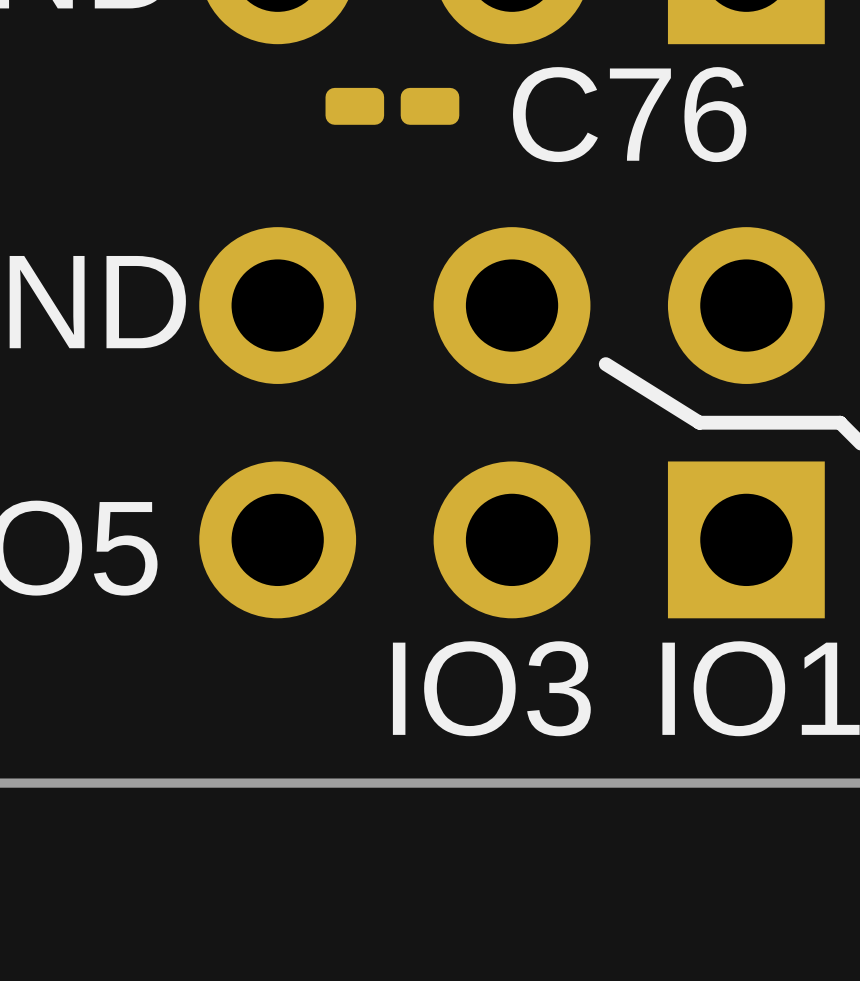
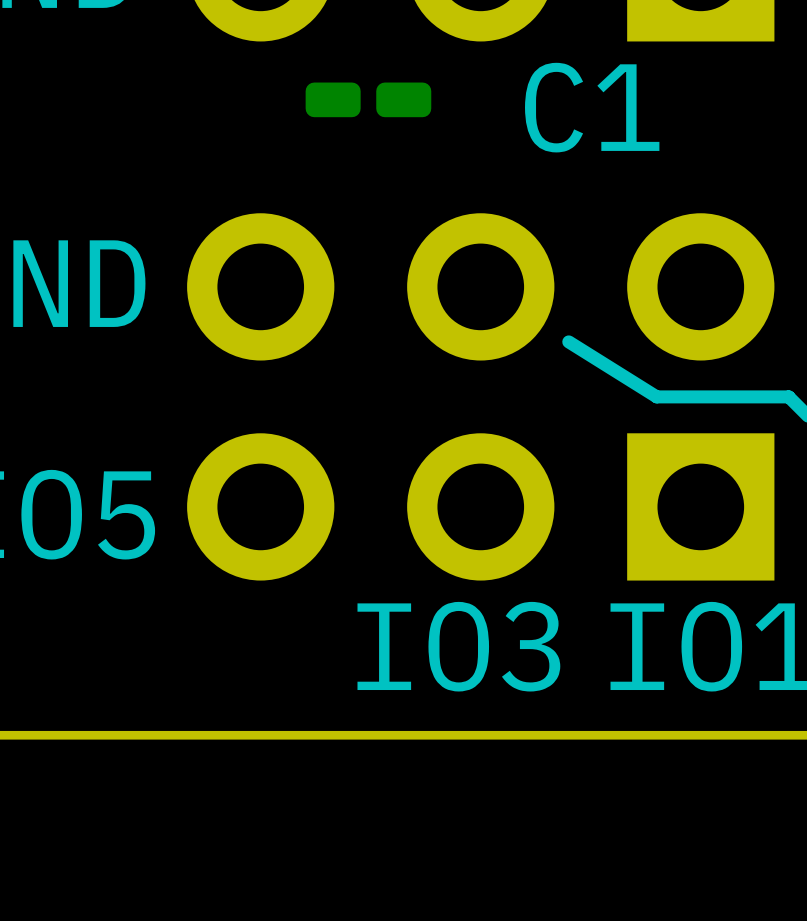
C76 name: C76 (629, 114) -> C1 (592, 107)

